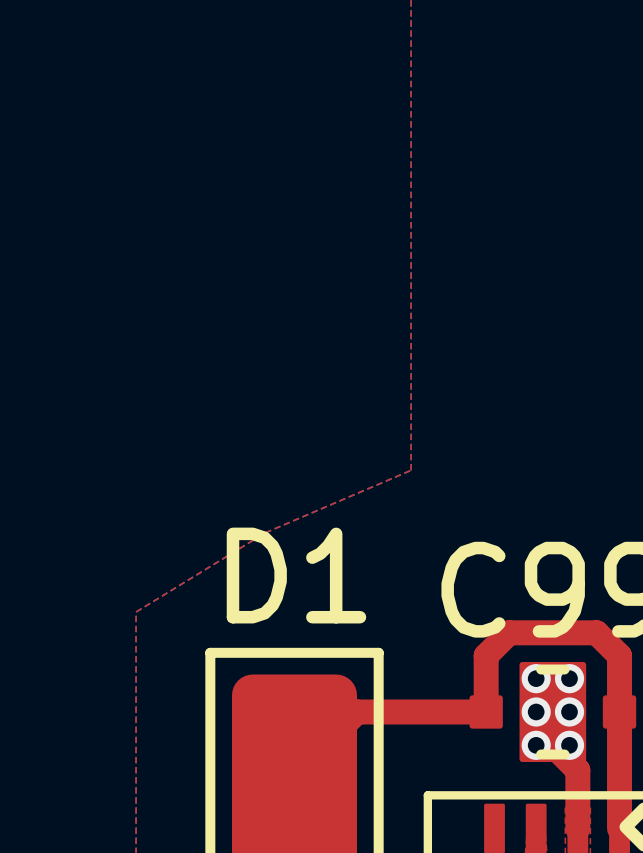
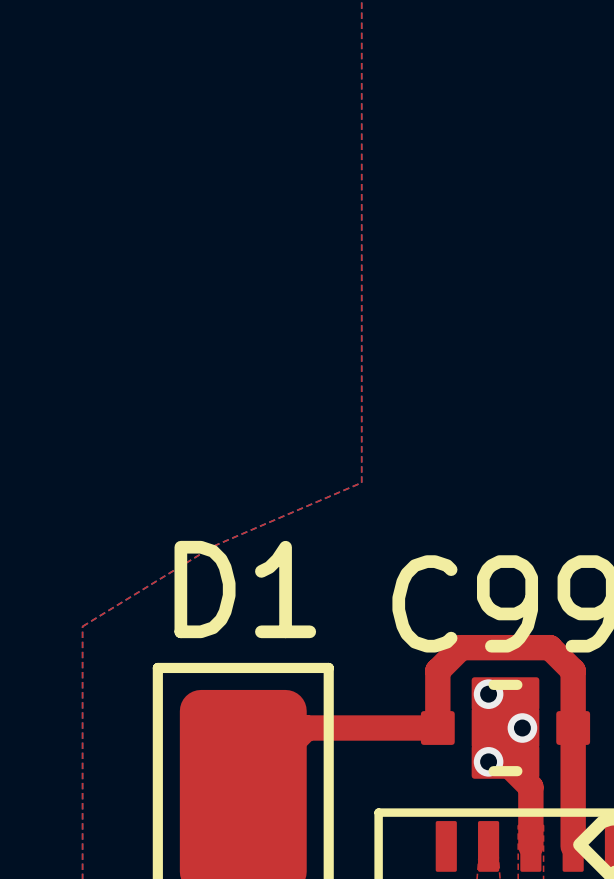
via: (569, 678) -> none
via: (536, 711) -> none
via: (569, 745) -> none

